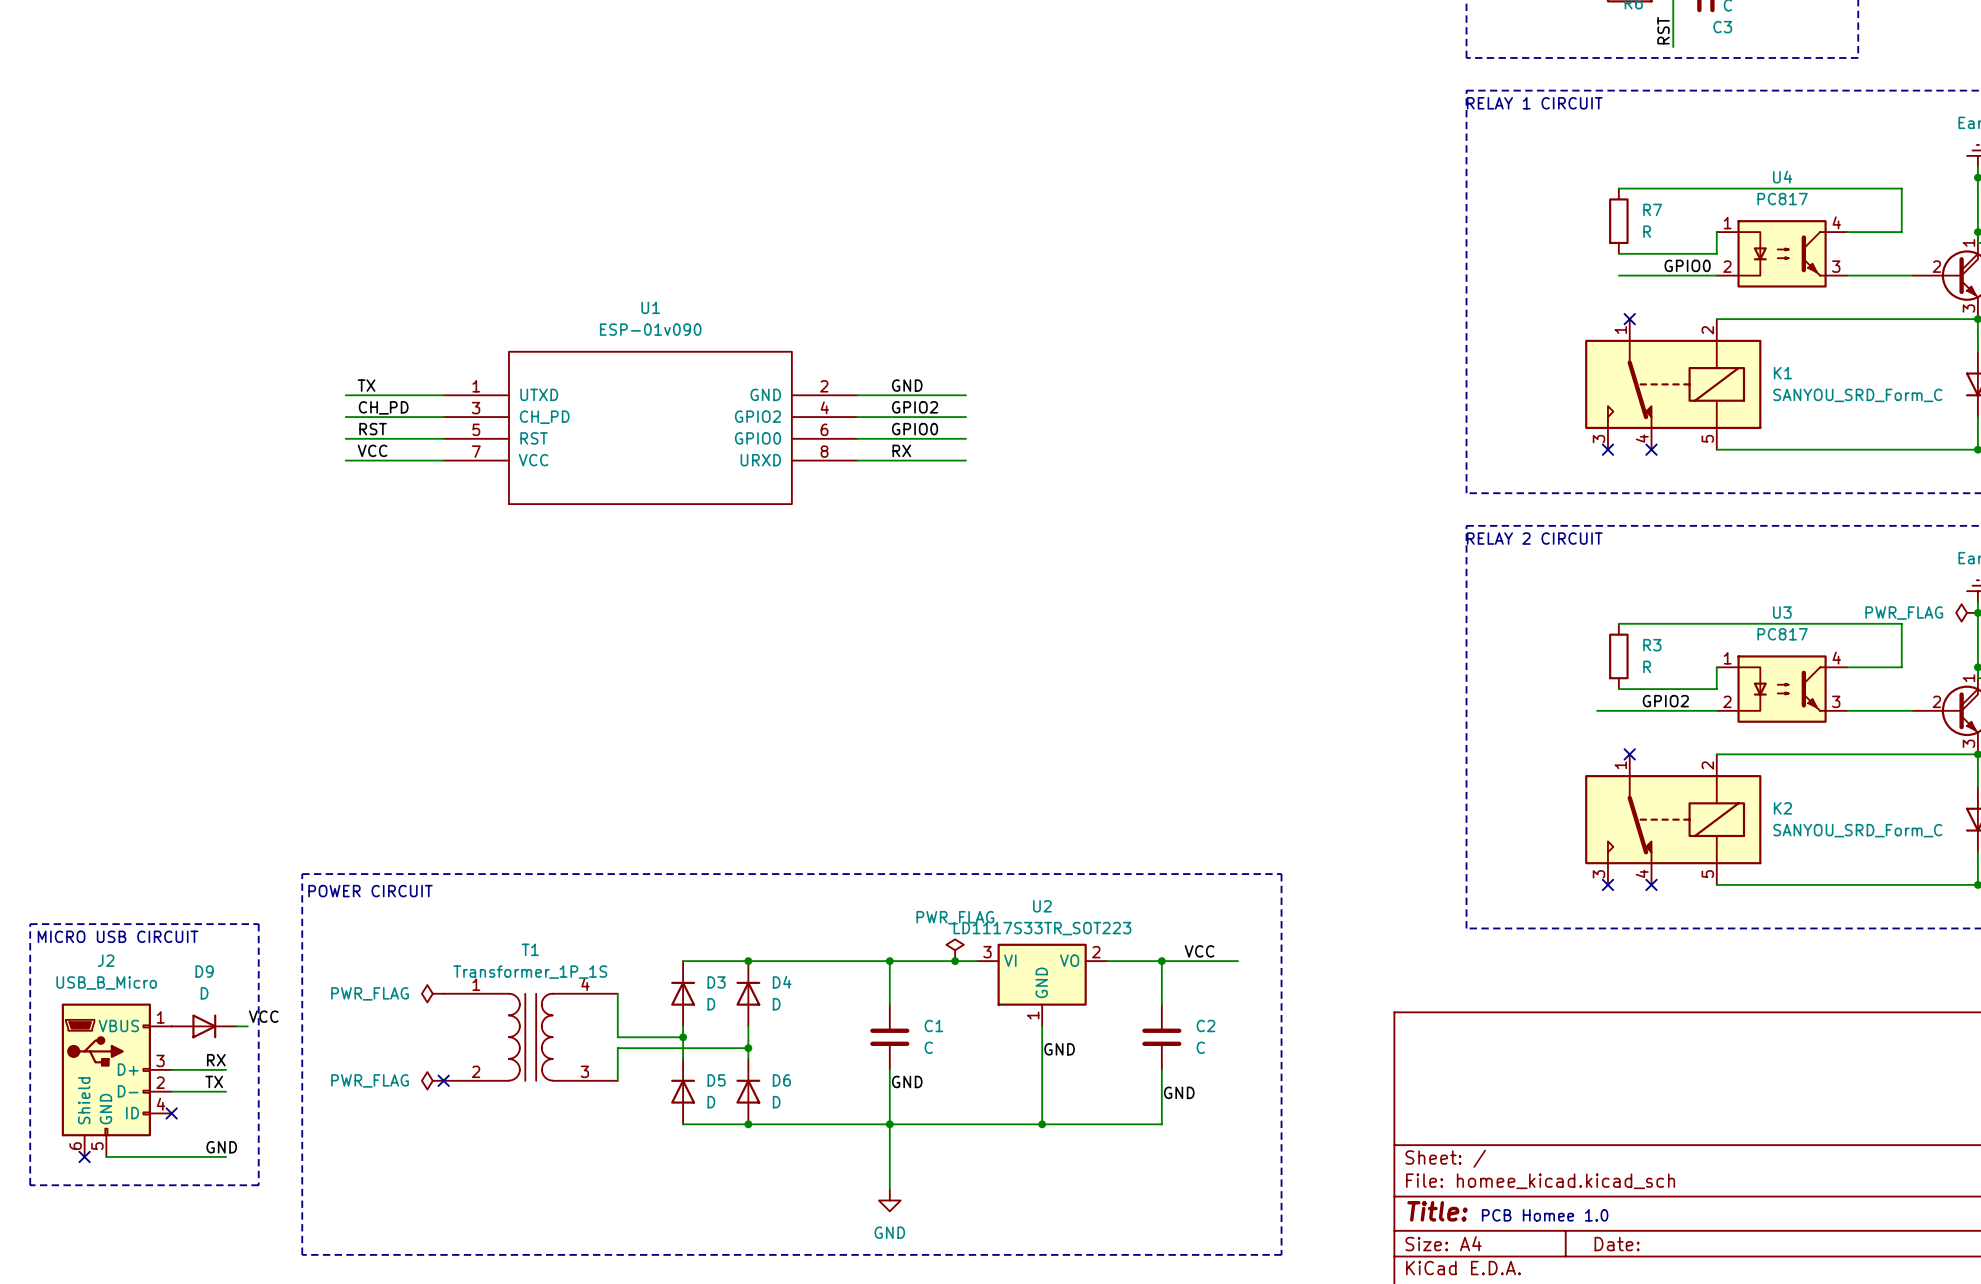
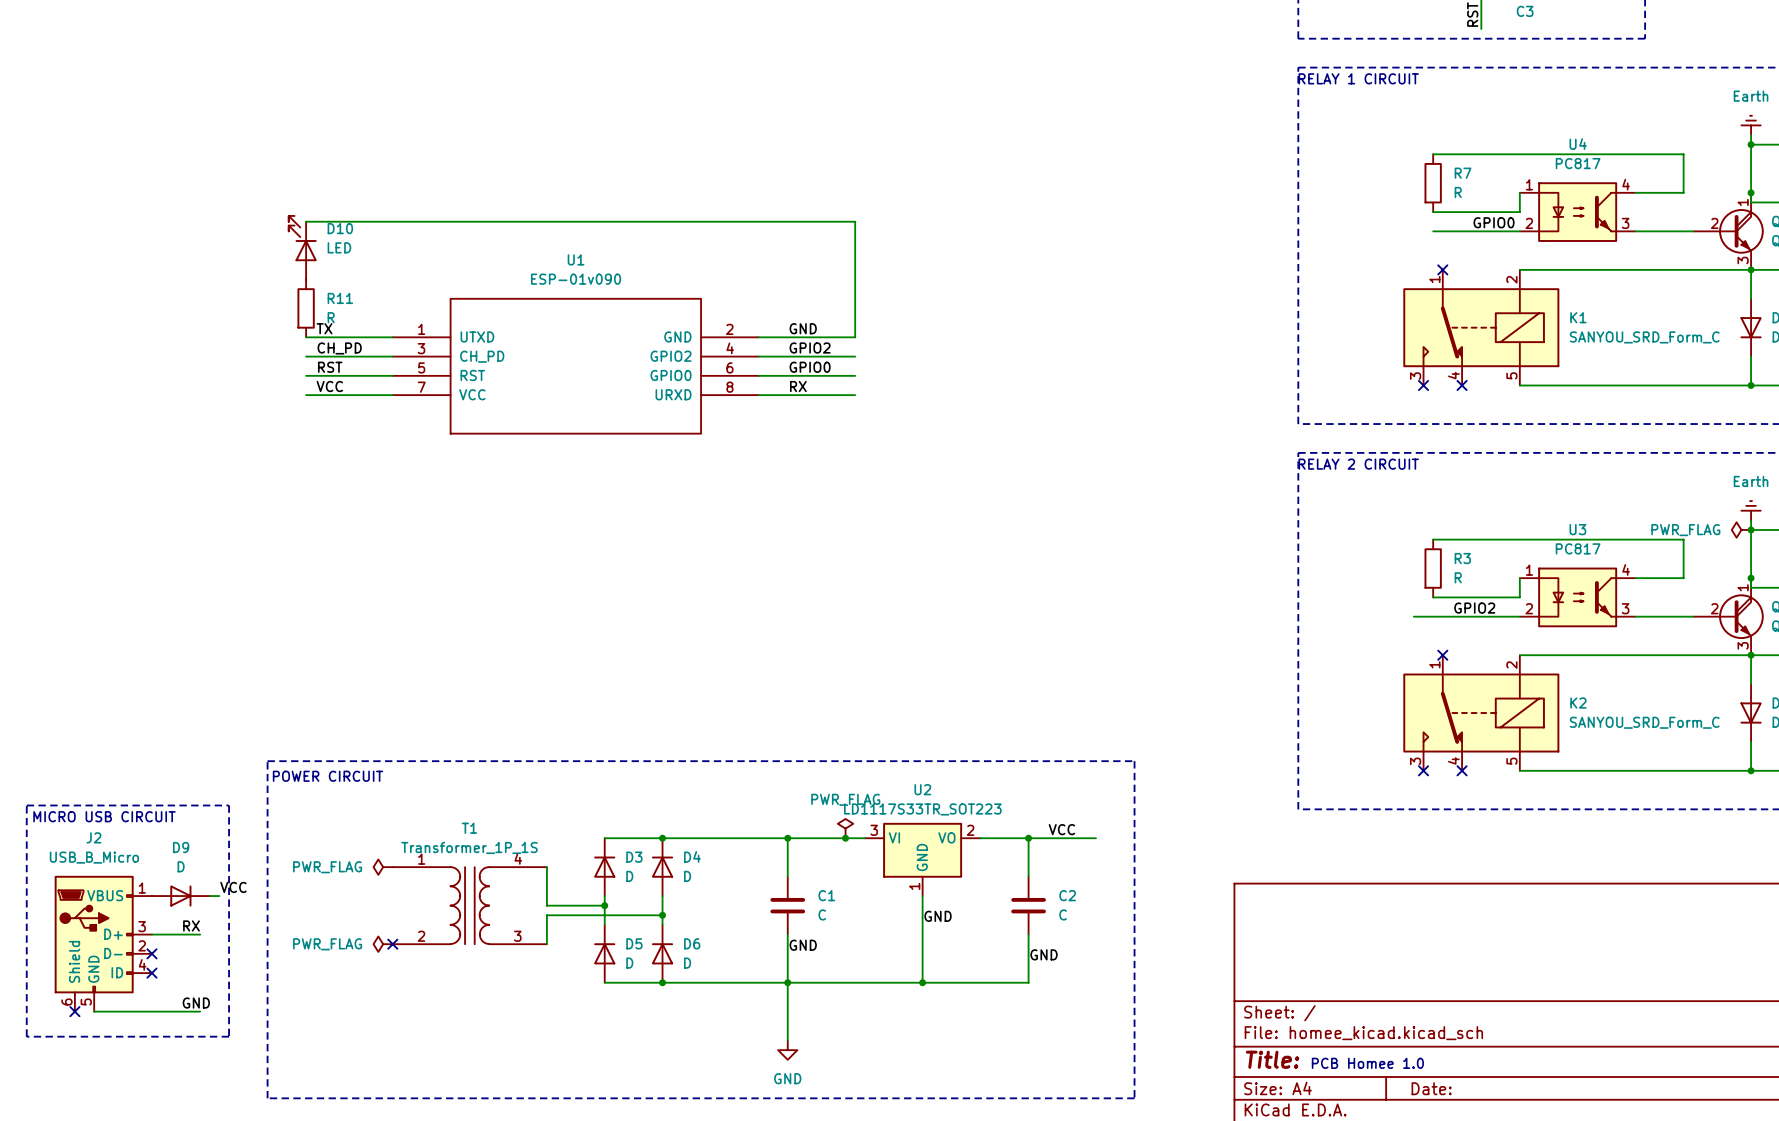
wire: none -> (306, 221) (855, 221) (855, 337)
D10: none -> LED (302, 247)
R11: none -> R (306, 308)
label: TX (214, 1081) -> none
wire: (171, 1091) (226, 1091) -> none
no-connect mark: none -> (151, 953)

